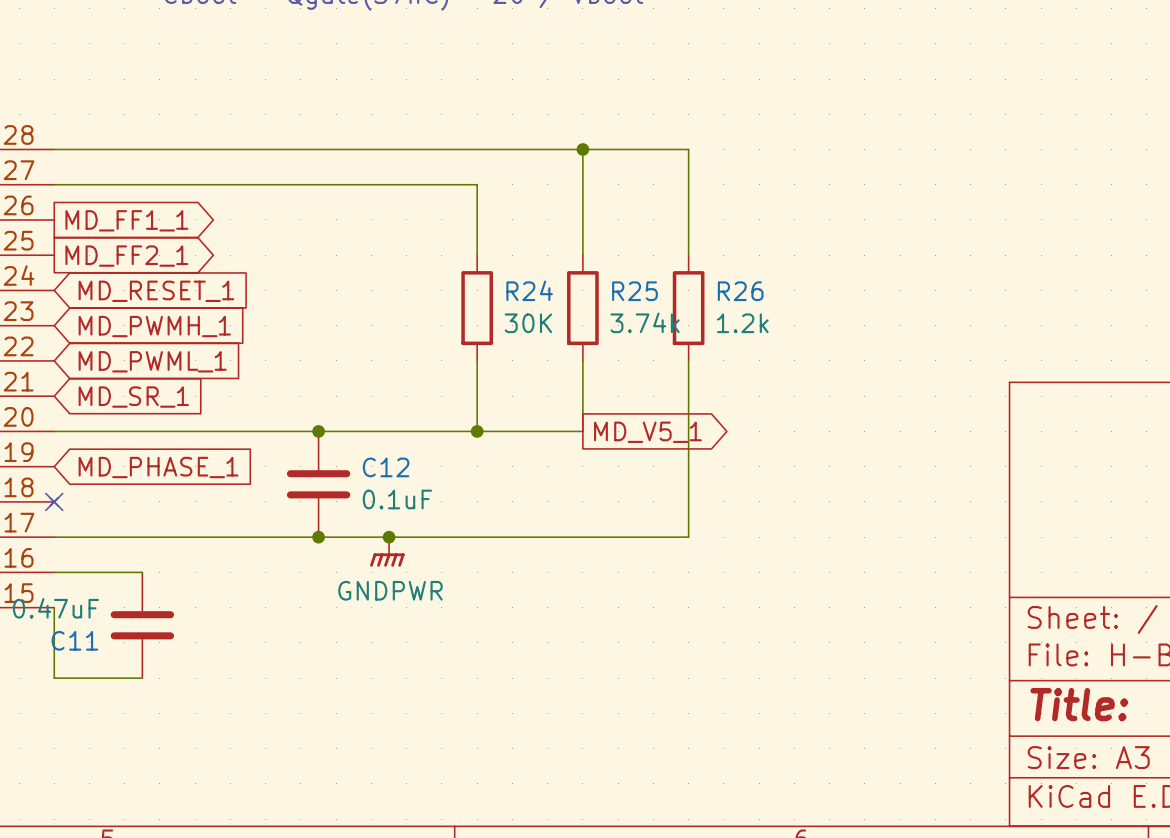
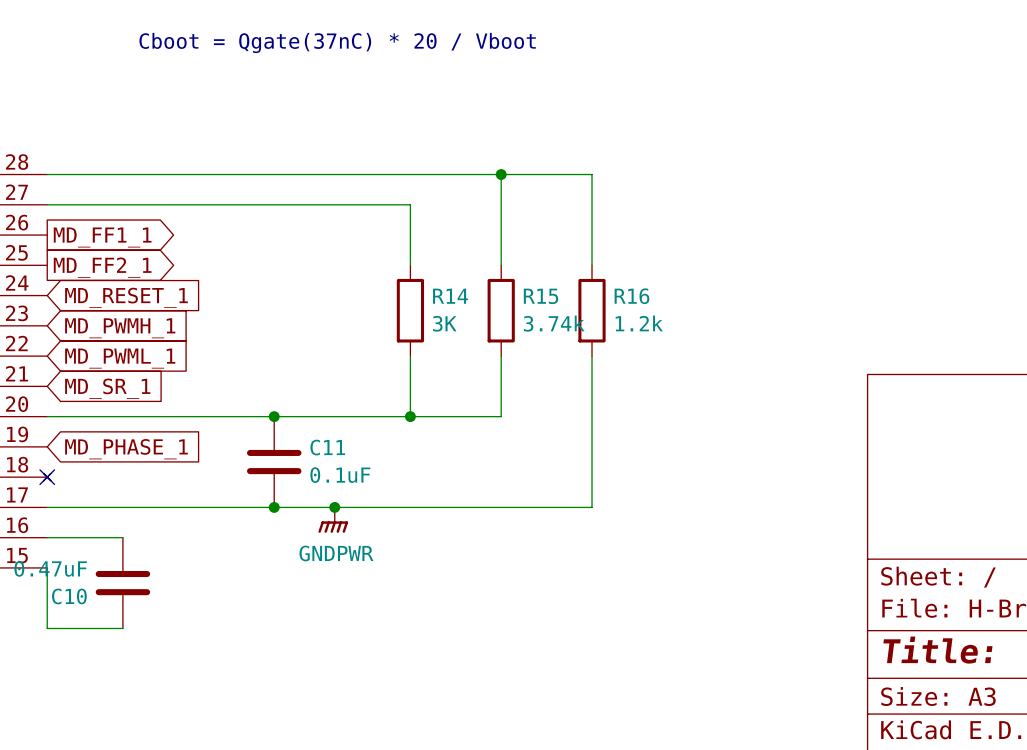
R24 name: R24 (529, 290) -> R14 (450, 296)
R25 name: R25 (634, 291) -> R15 (541, 296)
R26 name: R26 (740, 291) -> R16 (631, 296)
R24 value: 30K (528, 323) -> 3K (444, 323)
global label: MD_V5_1 (647, 432) -> none
C12 name: C12 (386, 467) -> C11 (327, 447)
C11 name: C11 (74, 640) -> C10 (69, 596)

